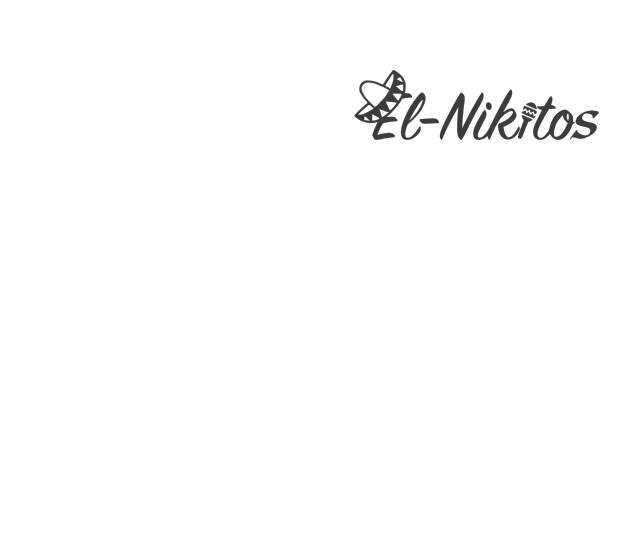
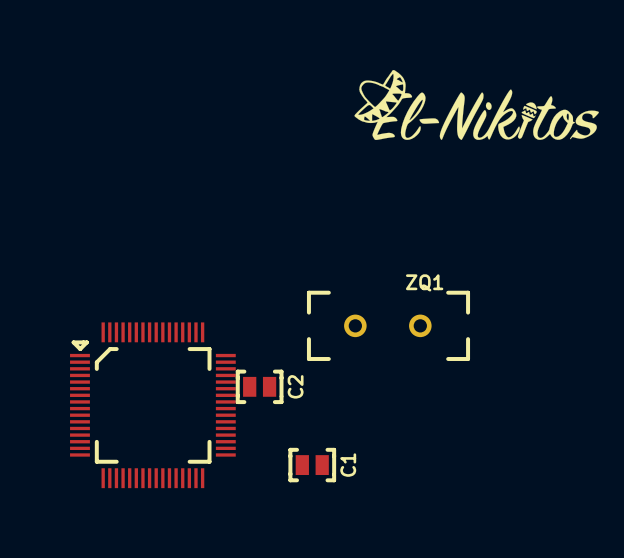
ZQ1: none -> (388, 325)
C2: none -> (259, 386)
part: none -> (152, 405)
C1: none -> (312, 465)

